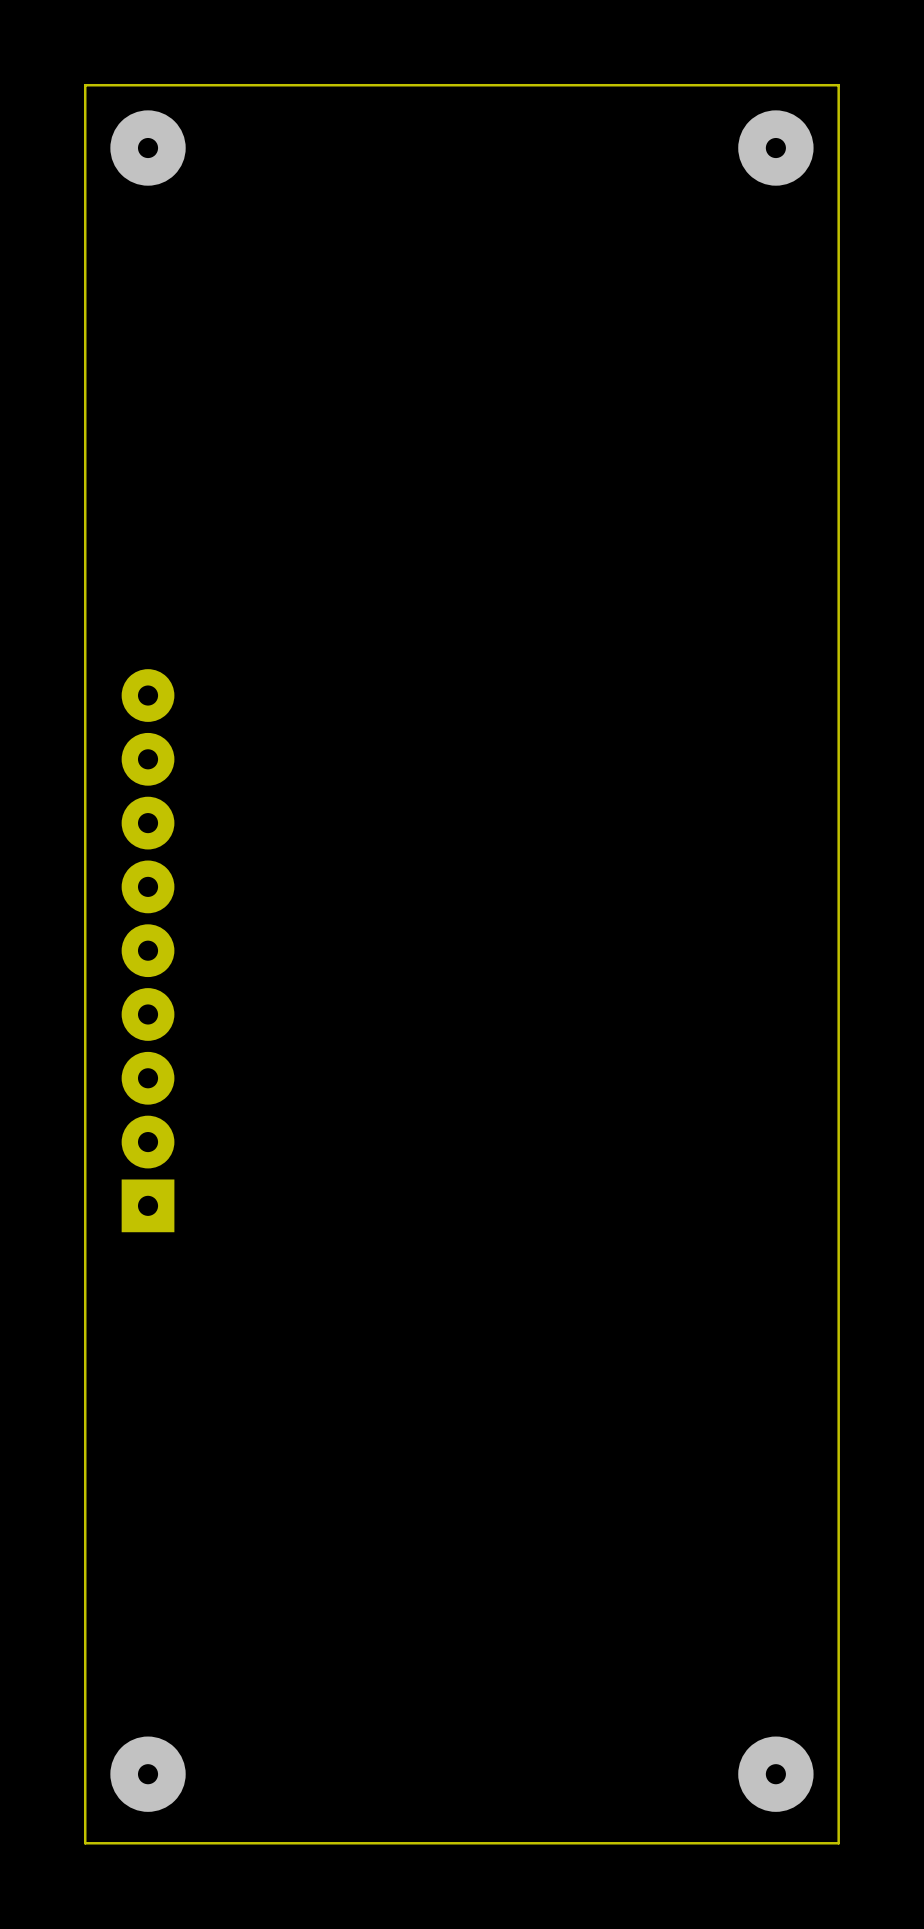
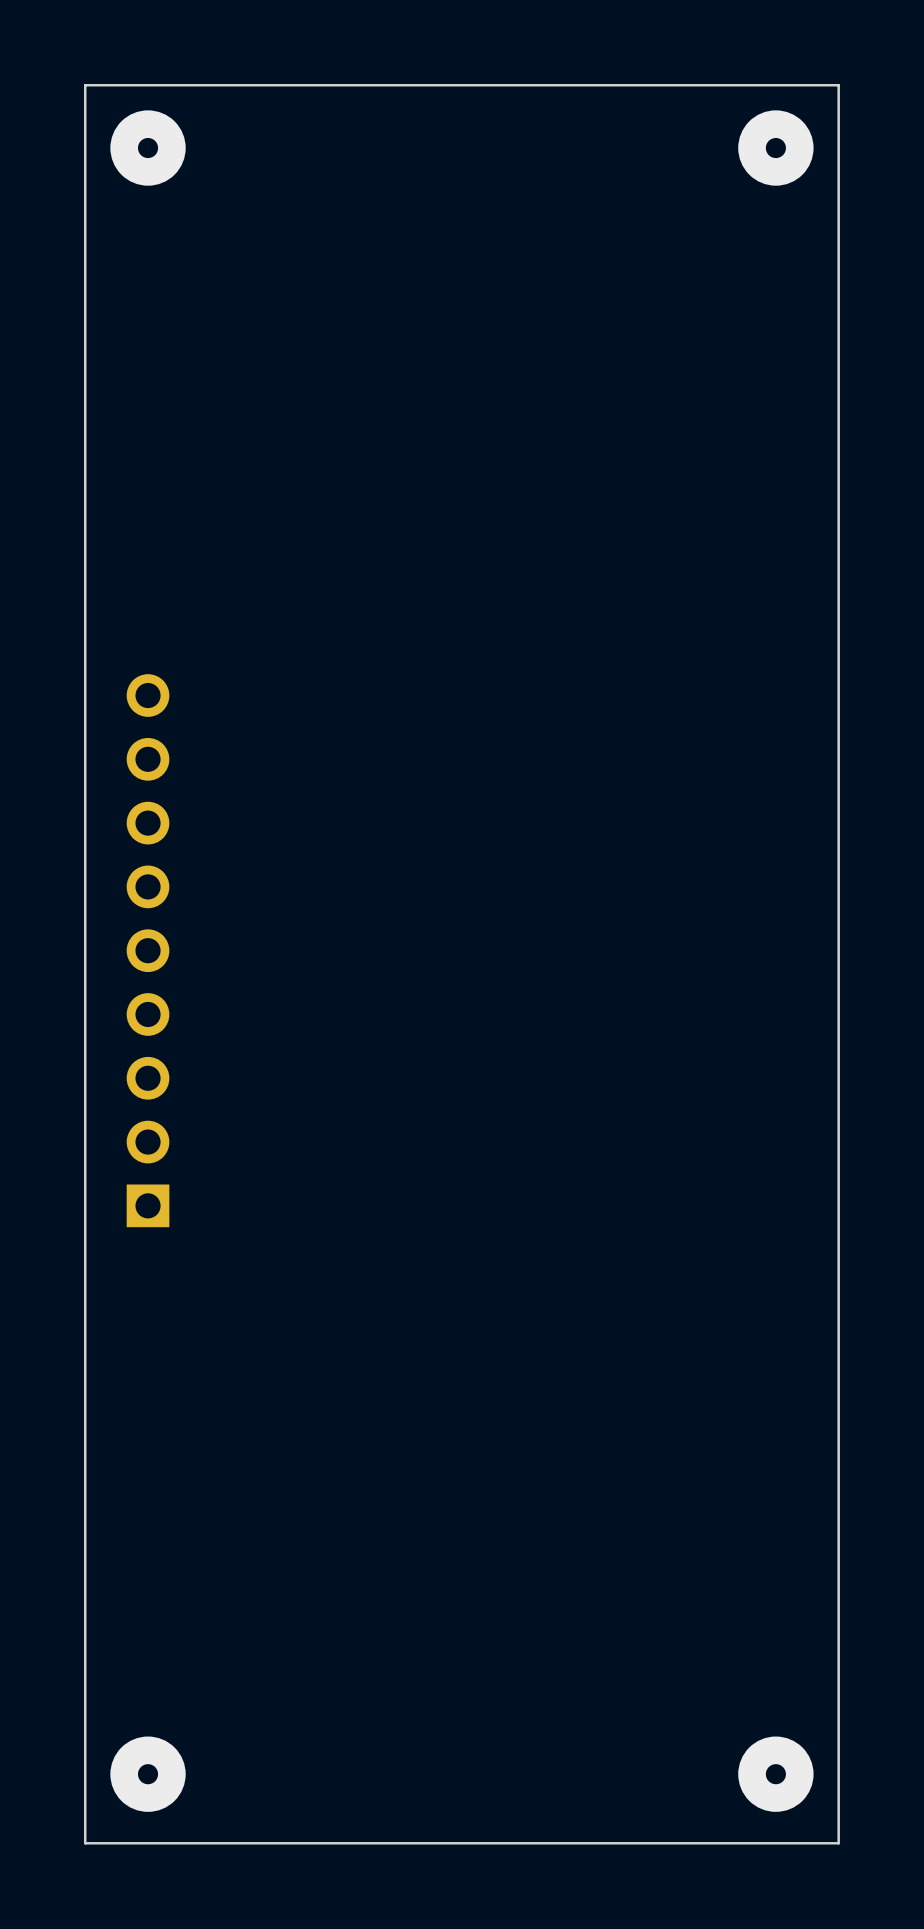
part footprint: [121, 669, 175, 1233] -> [126, 674, 170, 1228]

